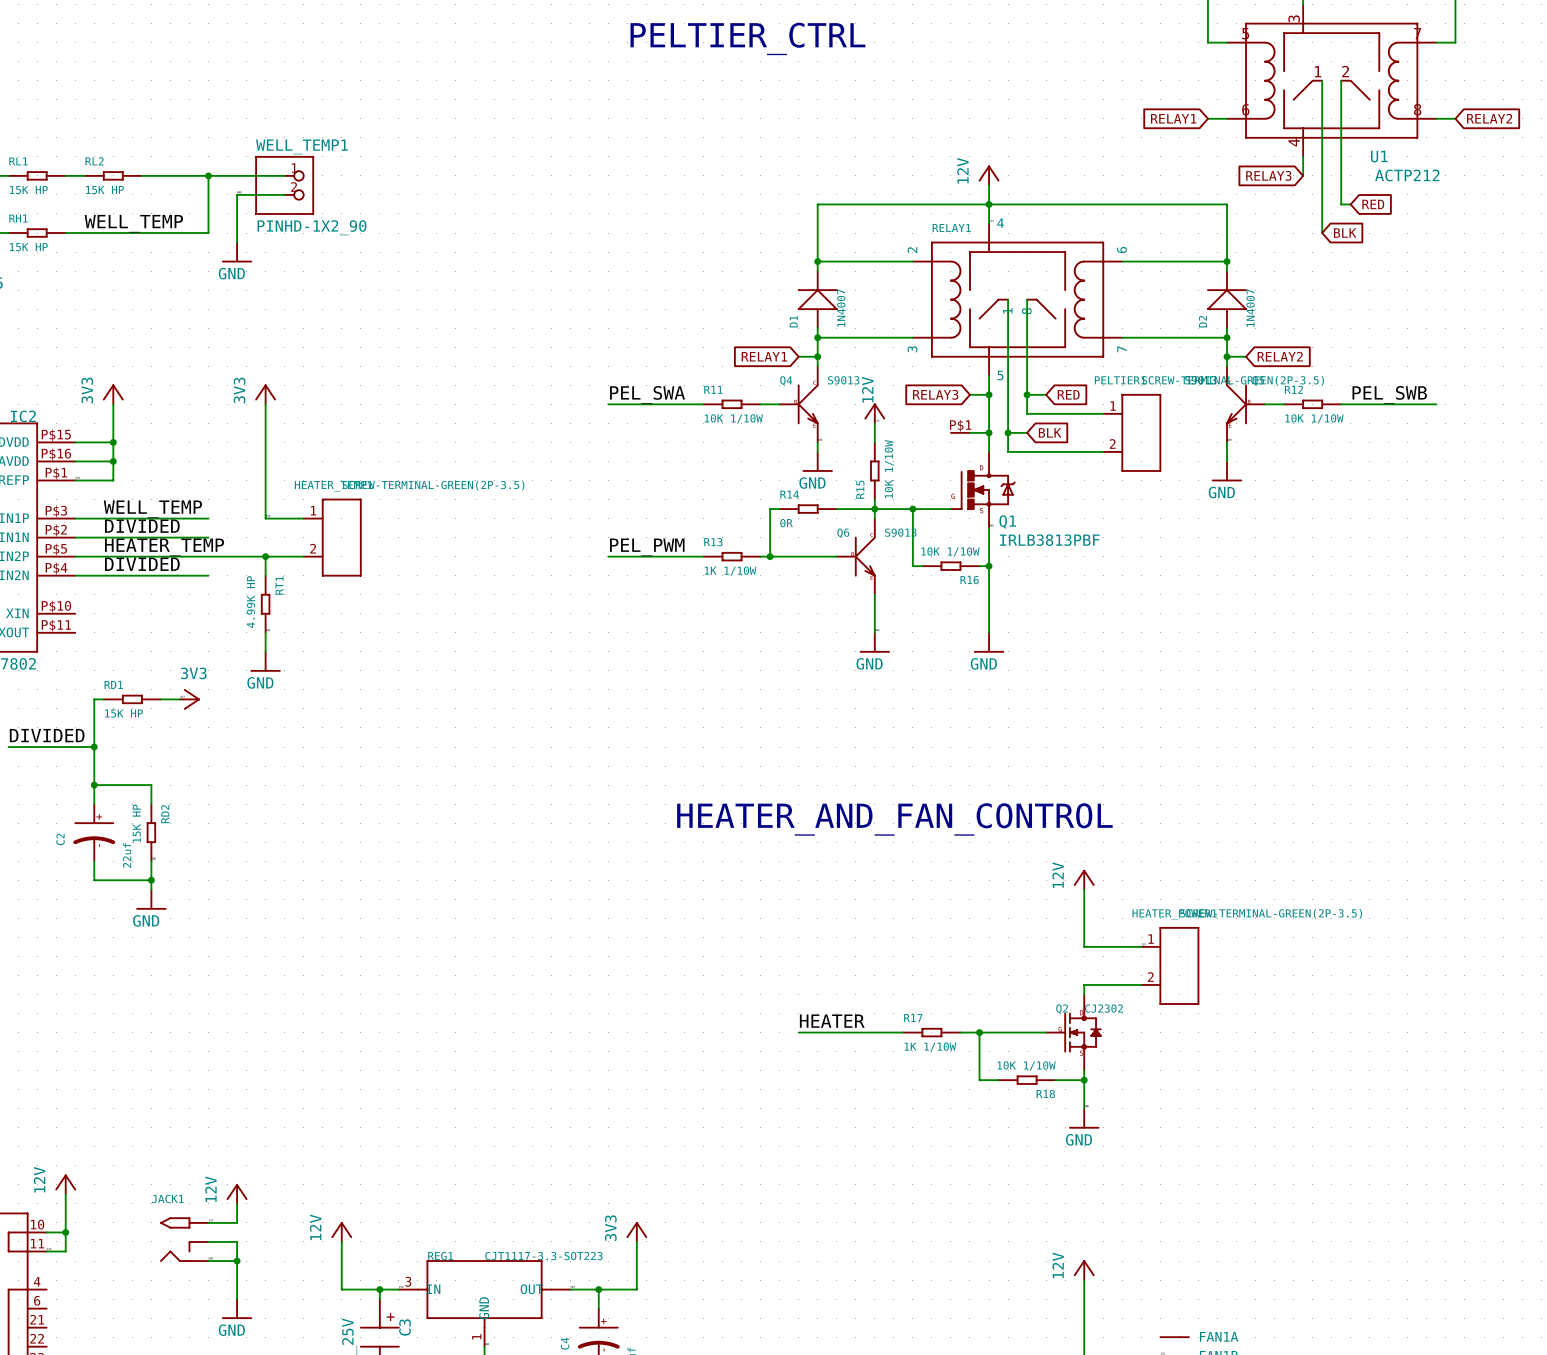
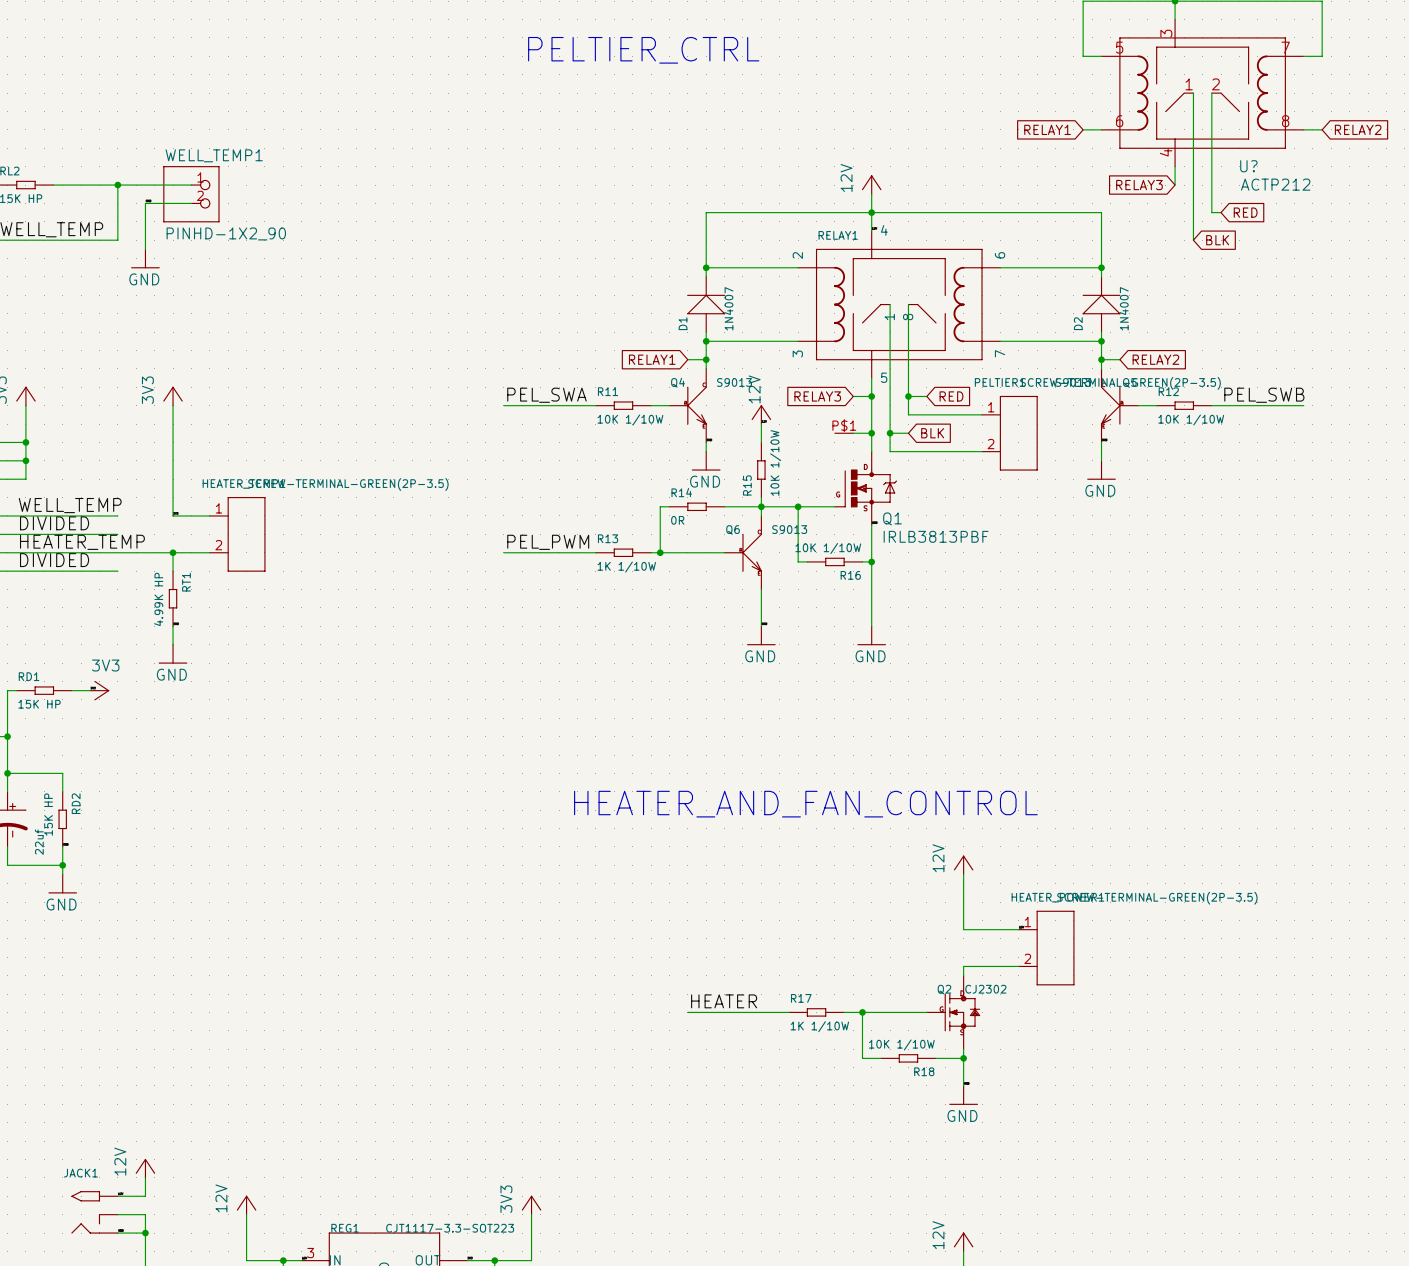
U1 name: U1 (1379, 156) -> U? (1248, 166)

